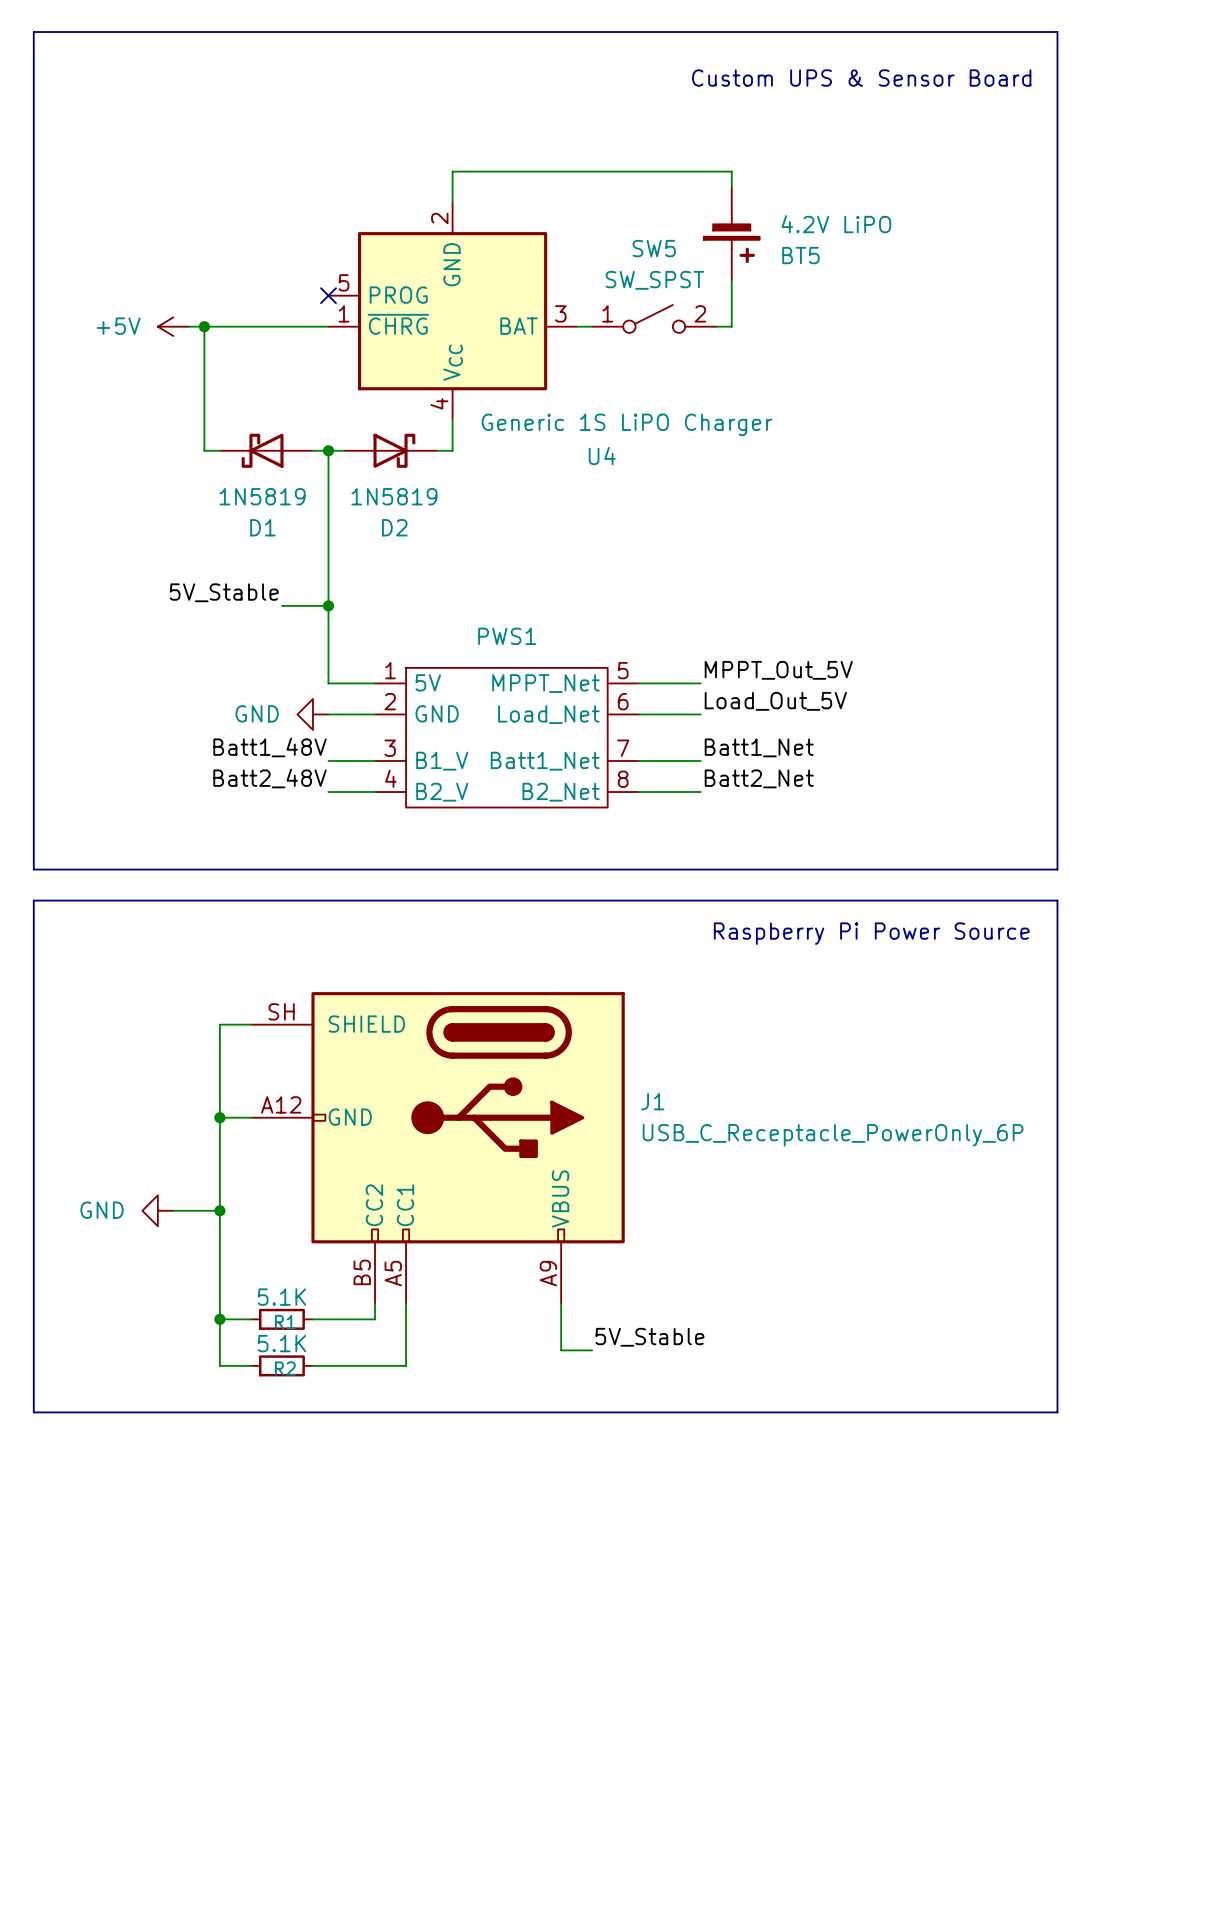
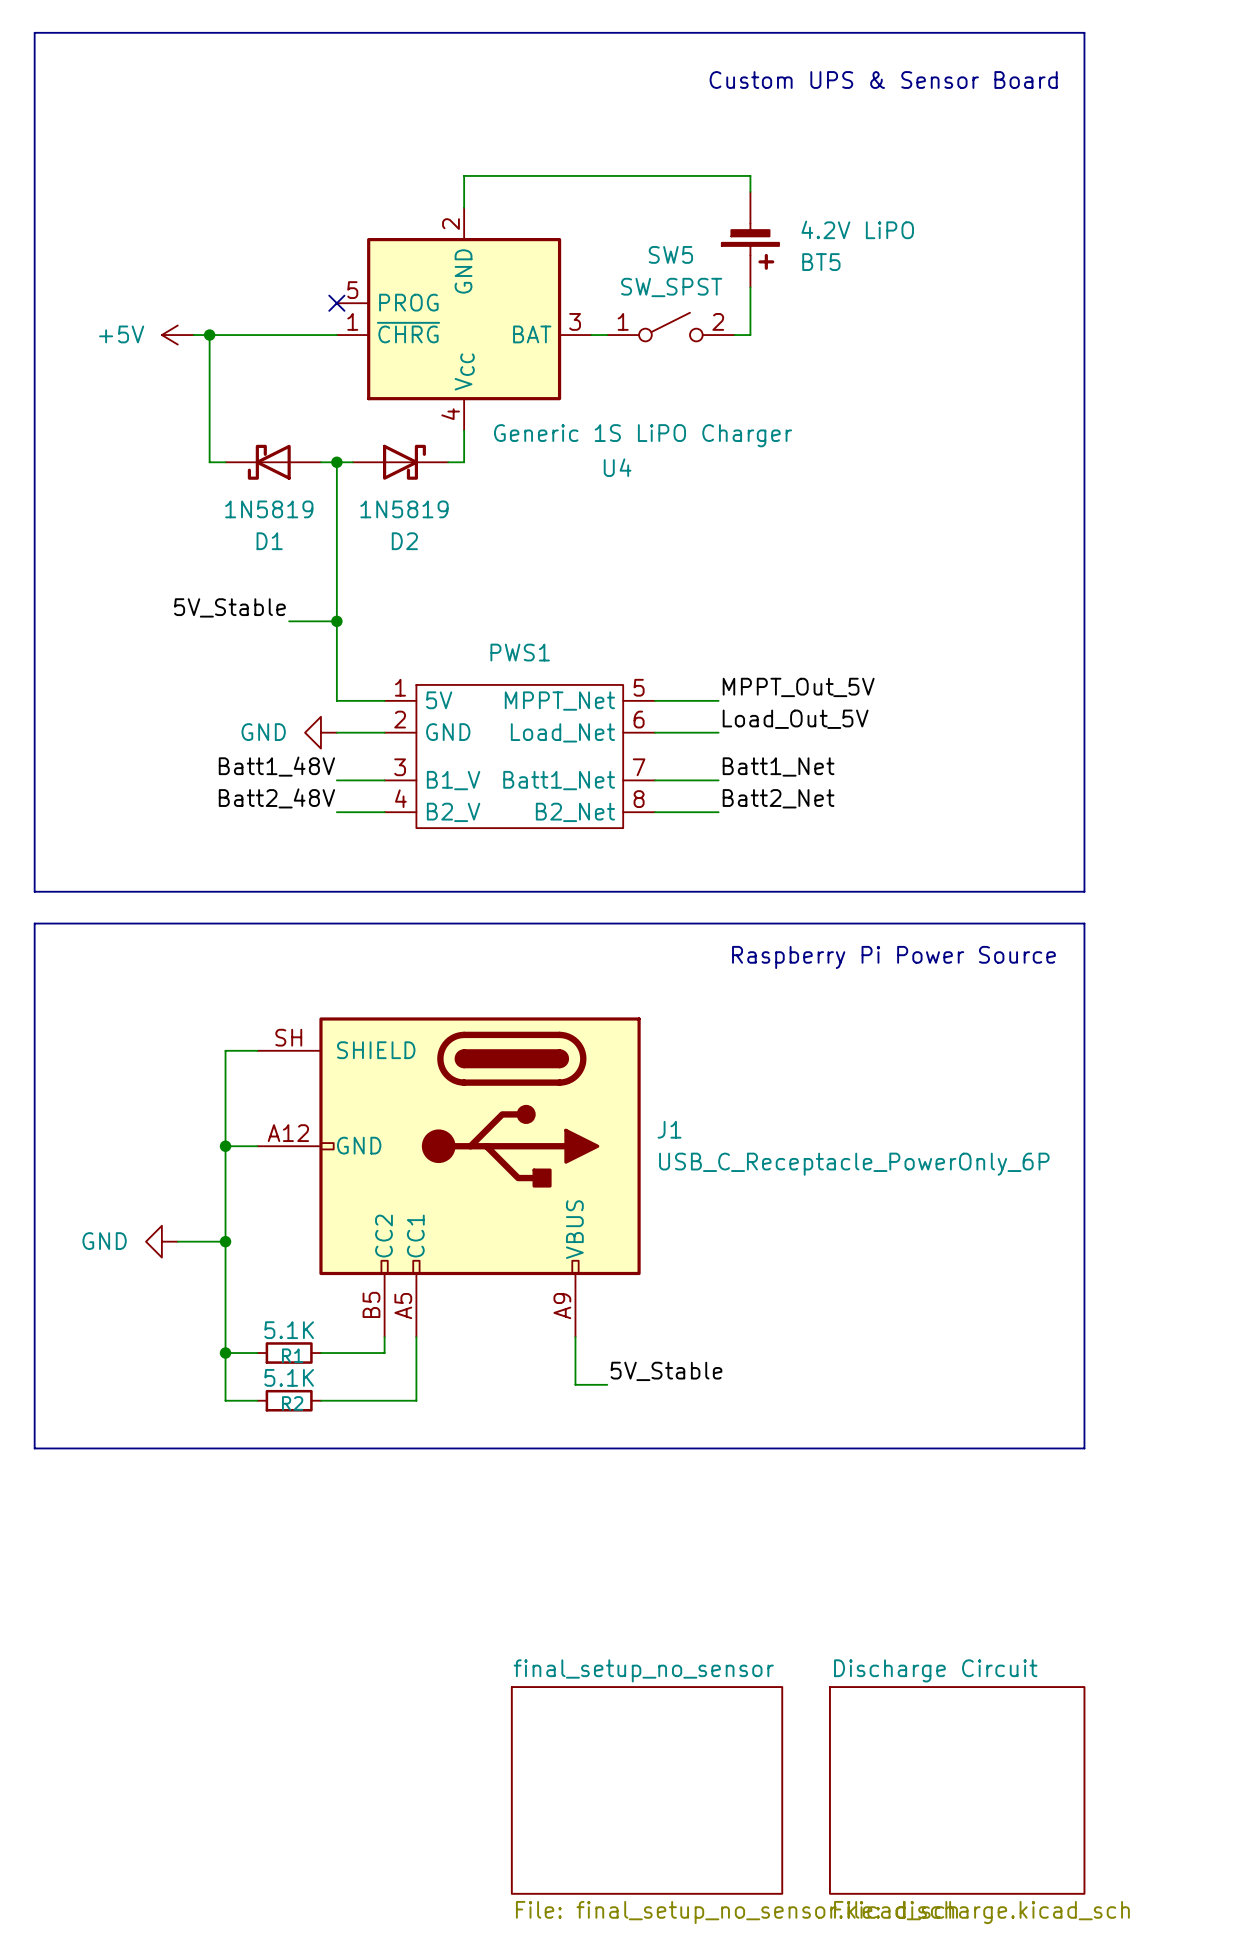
sheet final_setup_no_sensor: none -> File: final_setup_no_sensor.kicad_sch (647, 1790)
sheet Discharge Circuit: none -> File: discharge.kicad_sch (957, 1790)

